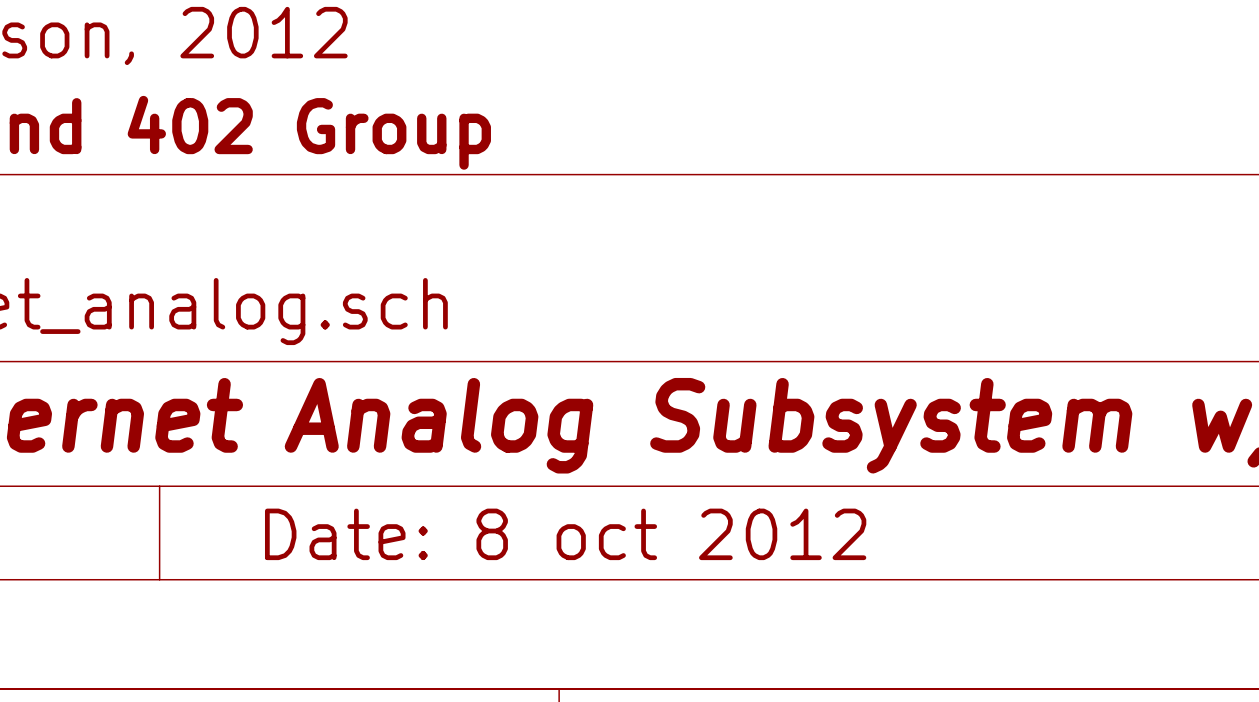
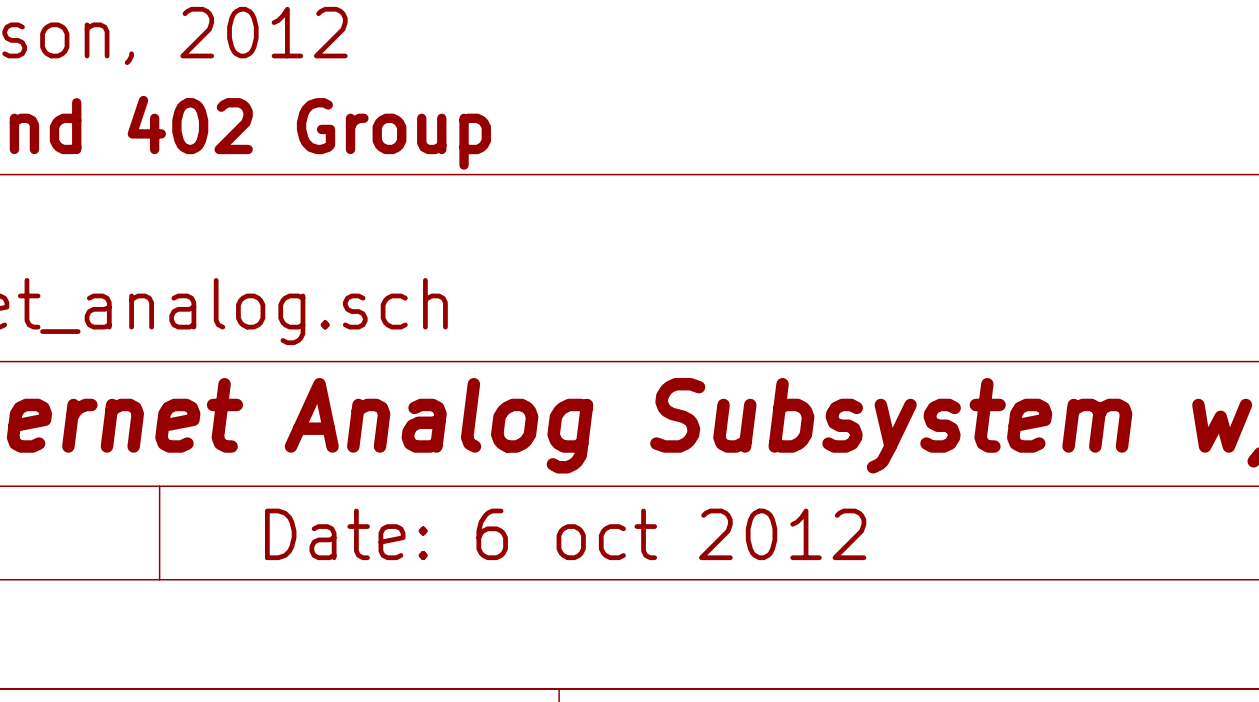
title block: Date: 8 oct 2012 (565, 534) -> Date: 6 oct 2012 (565, 534)

